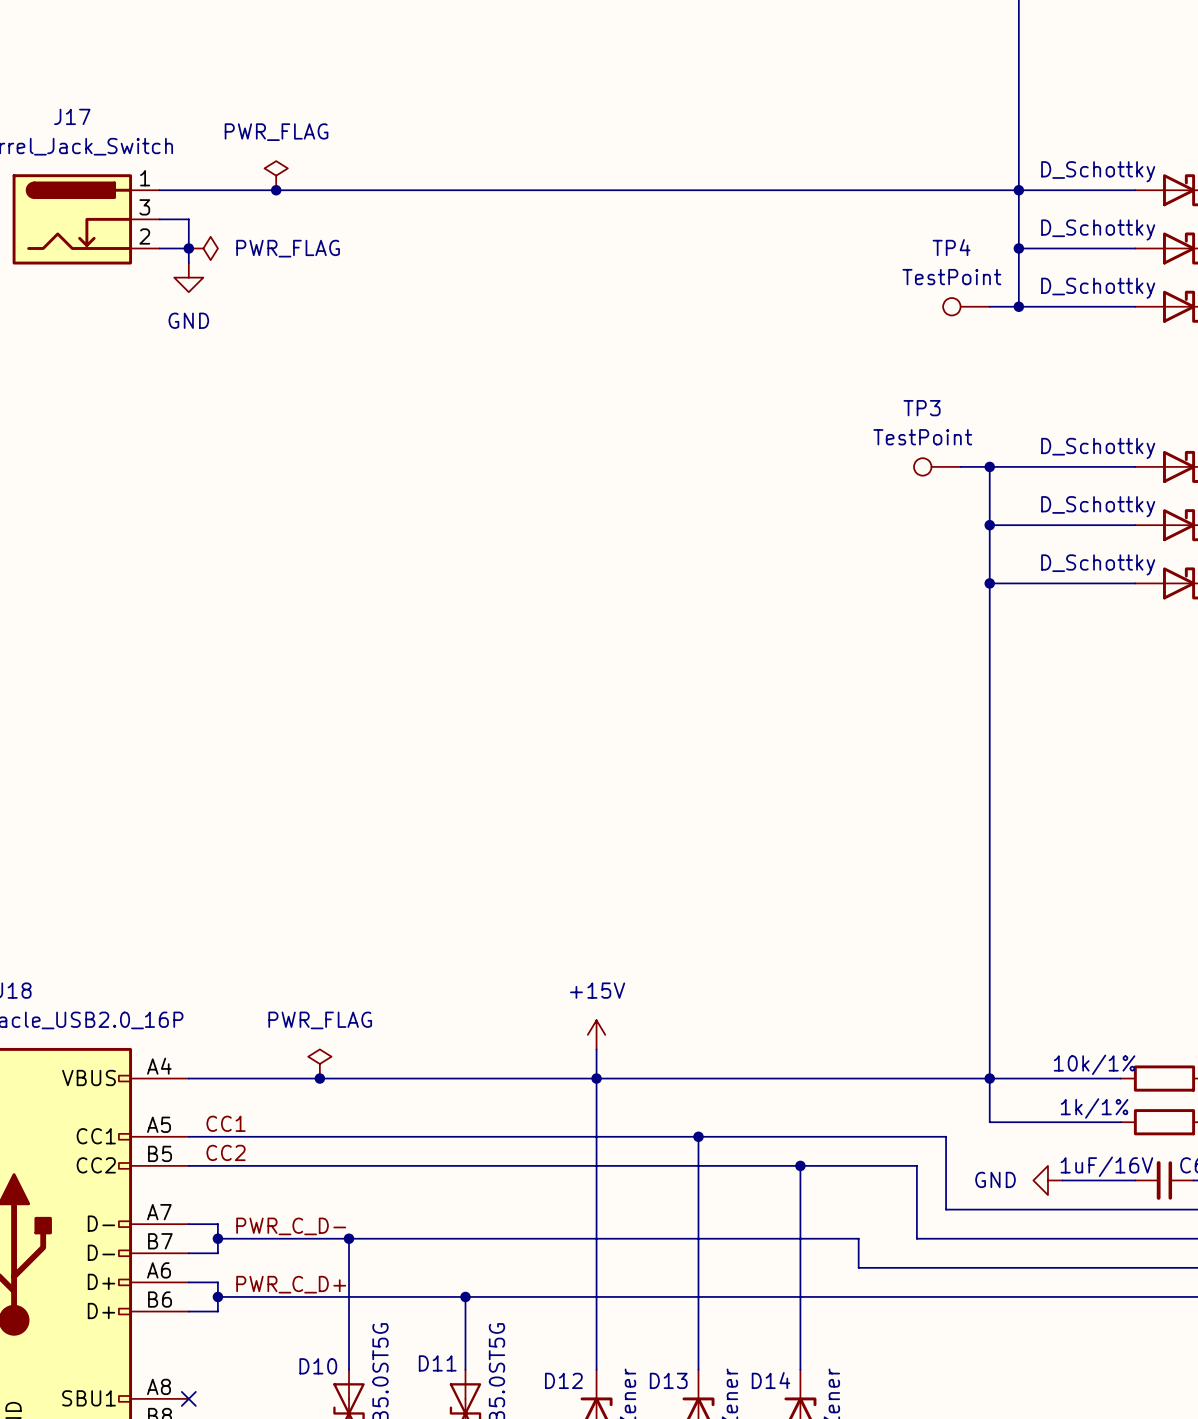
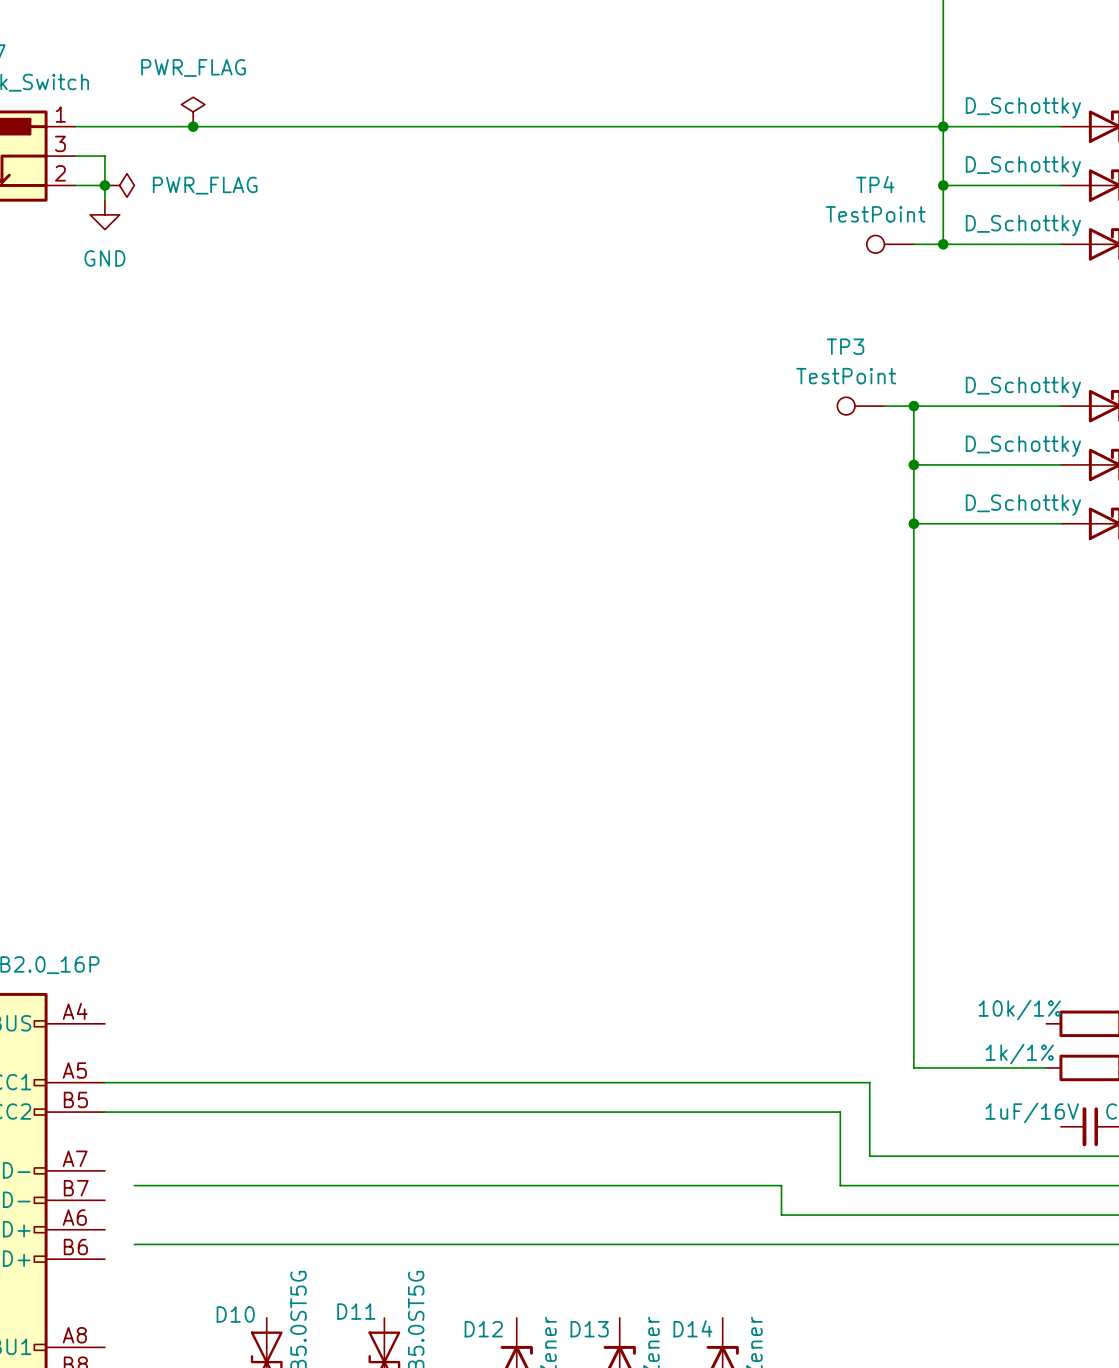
power symbol: +15V (596, 1034) -> none
wire: (596, 1049) (596, 1369) -> none
power symbol: PWR_FLAG (319, 1063) -> none
wire: (188, 1078) (1120, 1078) -> none
junction: (319, 1078) -> none
junction: (596, 1078) -> none
junction: (989, 1078) -> none
label: CC1 (226, 1123) -> none
wire: (698, 1136) (698, 1369) -> none
junction: (698, 1136) -> none
label: CC2 (226, 1152) -> none
wire: (800, 1165) (800, 1369) -> none
junction: (800, 1165) -> none
power symbol: GND (1047, 1180) -> none
wire: (1062, 1180) (1135, 1180) -> none
wire: (188, 1224) (217, 1224) (217, 1253) (188, 1253) -> none
label: PWR_C_D- (291, 1226) -> none
junction: (217, 1238) -> none
wire: (349, 1238) (349, 1369) -> none
junction: (349, 1238) -> none
wire: (188, 1282) (217, 1282) (217, 1311) (188, 1311) -> none
label: PWR_C_D+ (291, 1284) -> none
junction: (217, 1296) -> none
wire: (465, 1296) (465, 1369) -> none
junction: (465, 1296) -> none
no-connect mark: (188, 1398) -> none

